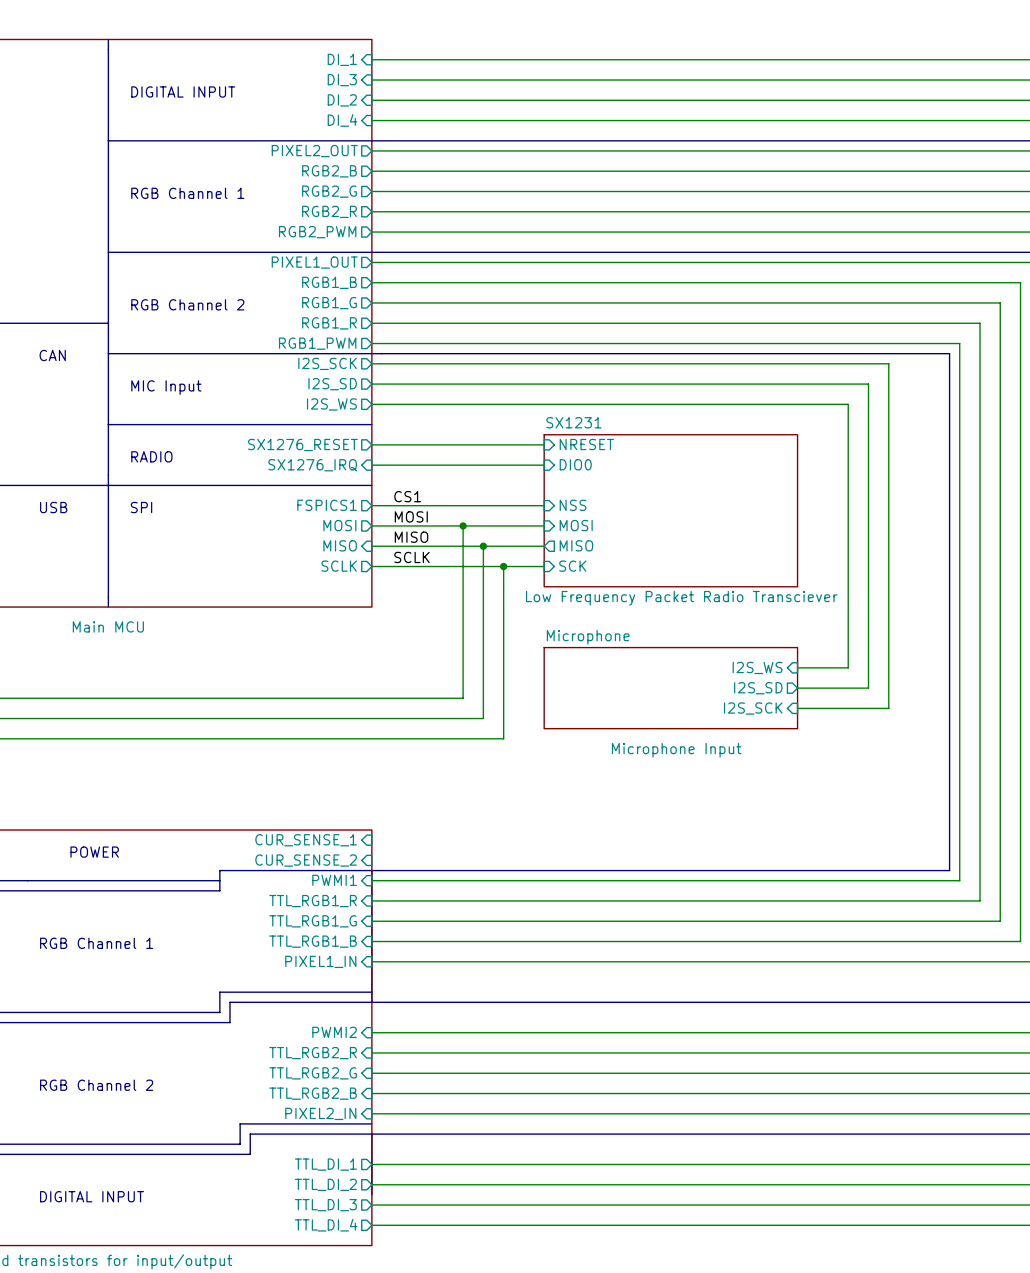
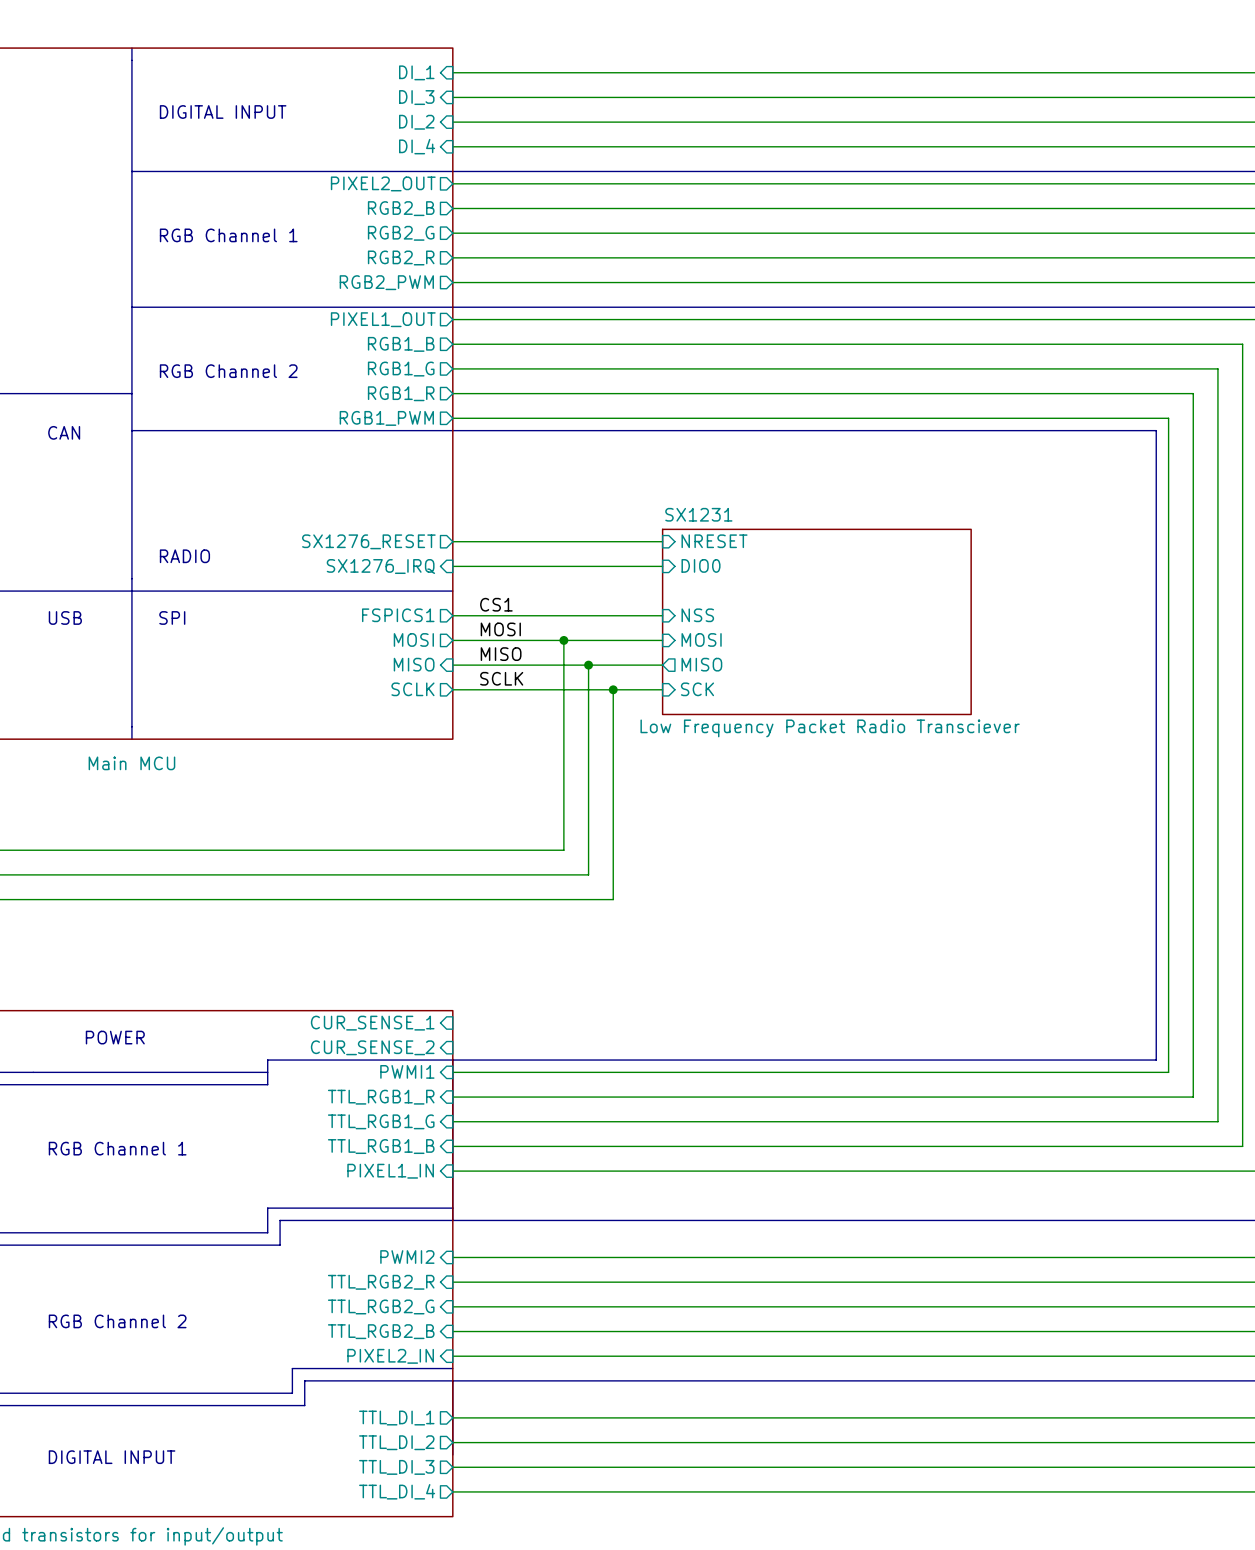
sheet pin: I2S_SCK (327, 363) -> none
wire: (371, 363) (888, 363) (888, 708) (797, 708) -> none
sheet pin: I2S_SD (332, 384) -> none
wire: (371, 384) (868, 384) (868, 688) (797, 688) -> none
text: MIC Input (166, 387) -> none
sheet pin: I2S_WS (331, 404) -> none
wire: (371, 404) (848, 404) (848, 667) (797, 667) -> none
line: (108, 424) (371, 424) -> none
sheet pin: I2S_WS (757, 667) -> none
sheet Microphone: (670, 688) -> none
sheet pin: I2S_SD (758, 688) -> none
sheet pin: I2S_SCK (753, 708) -> none

